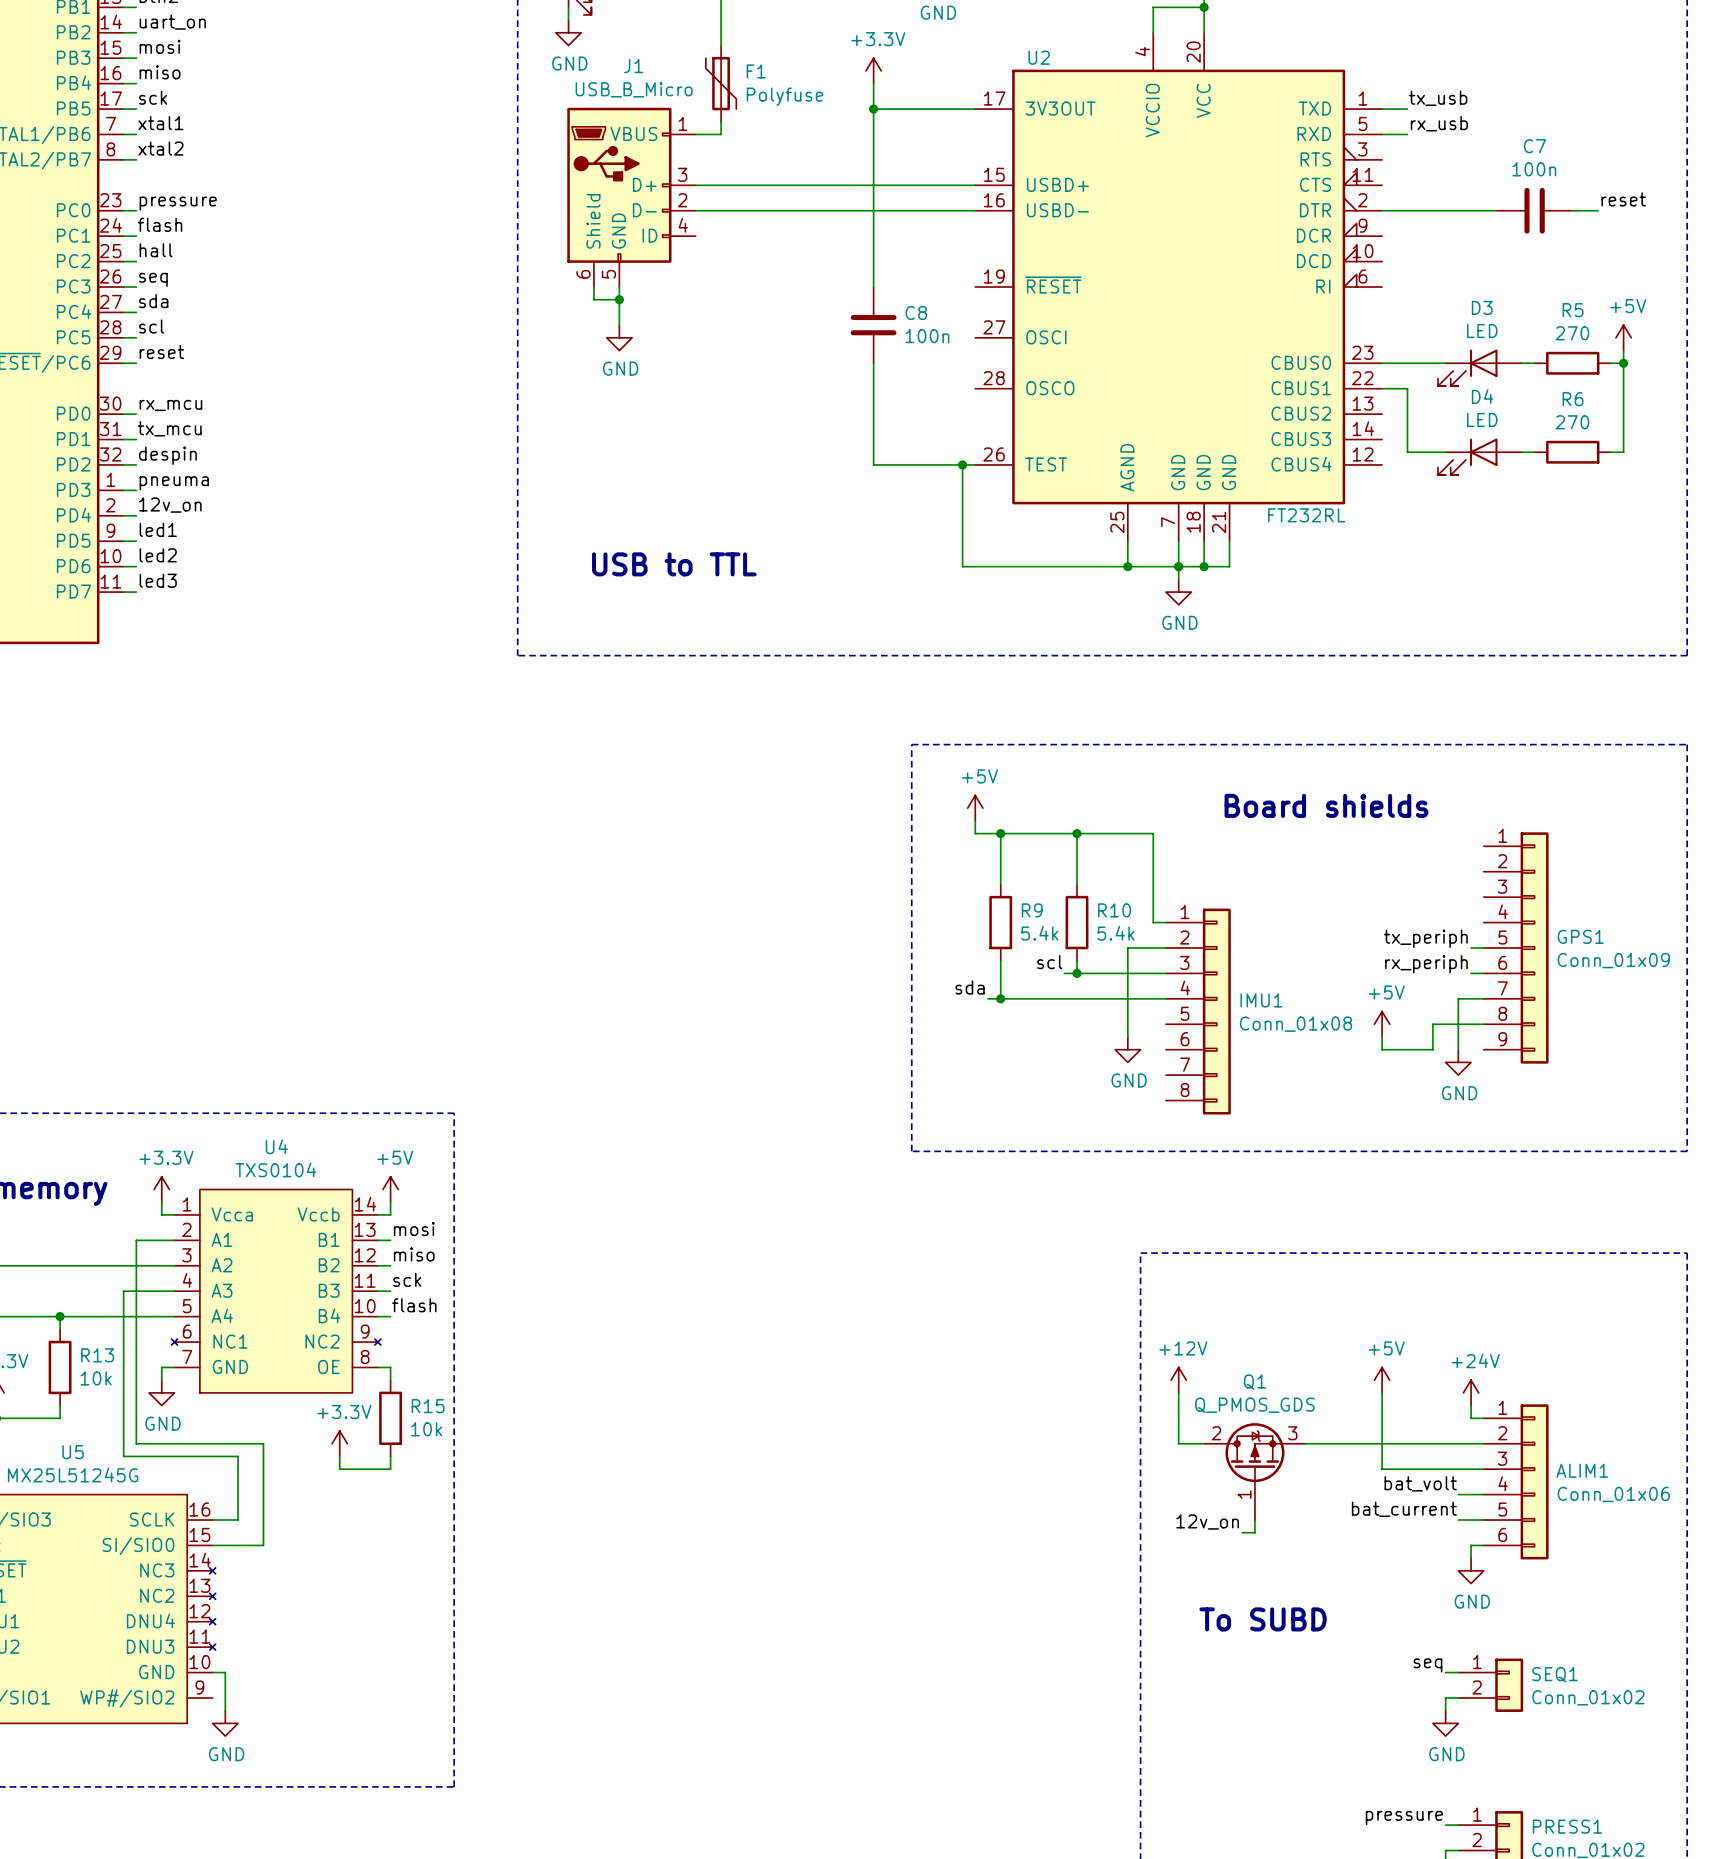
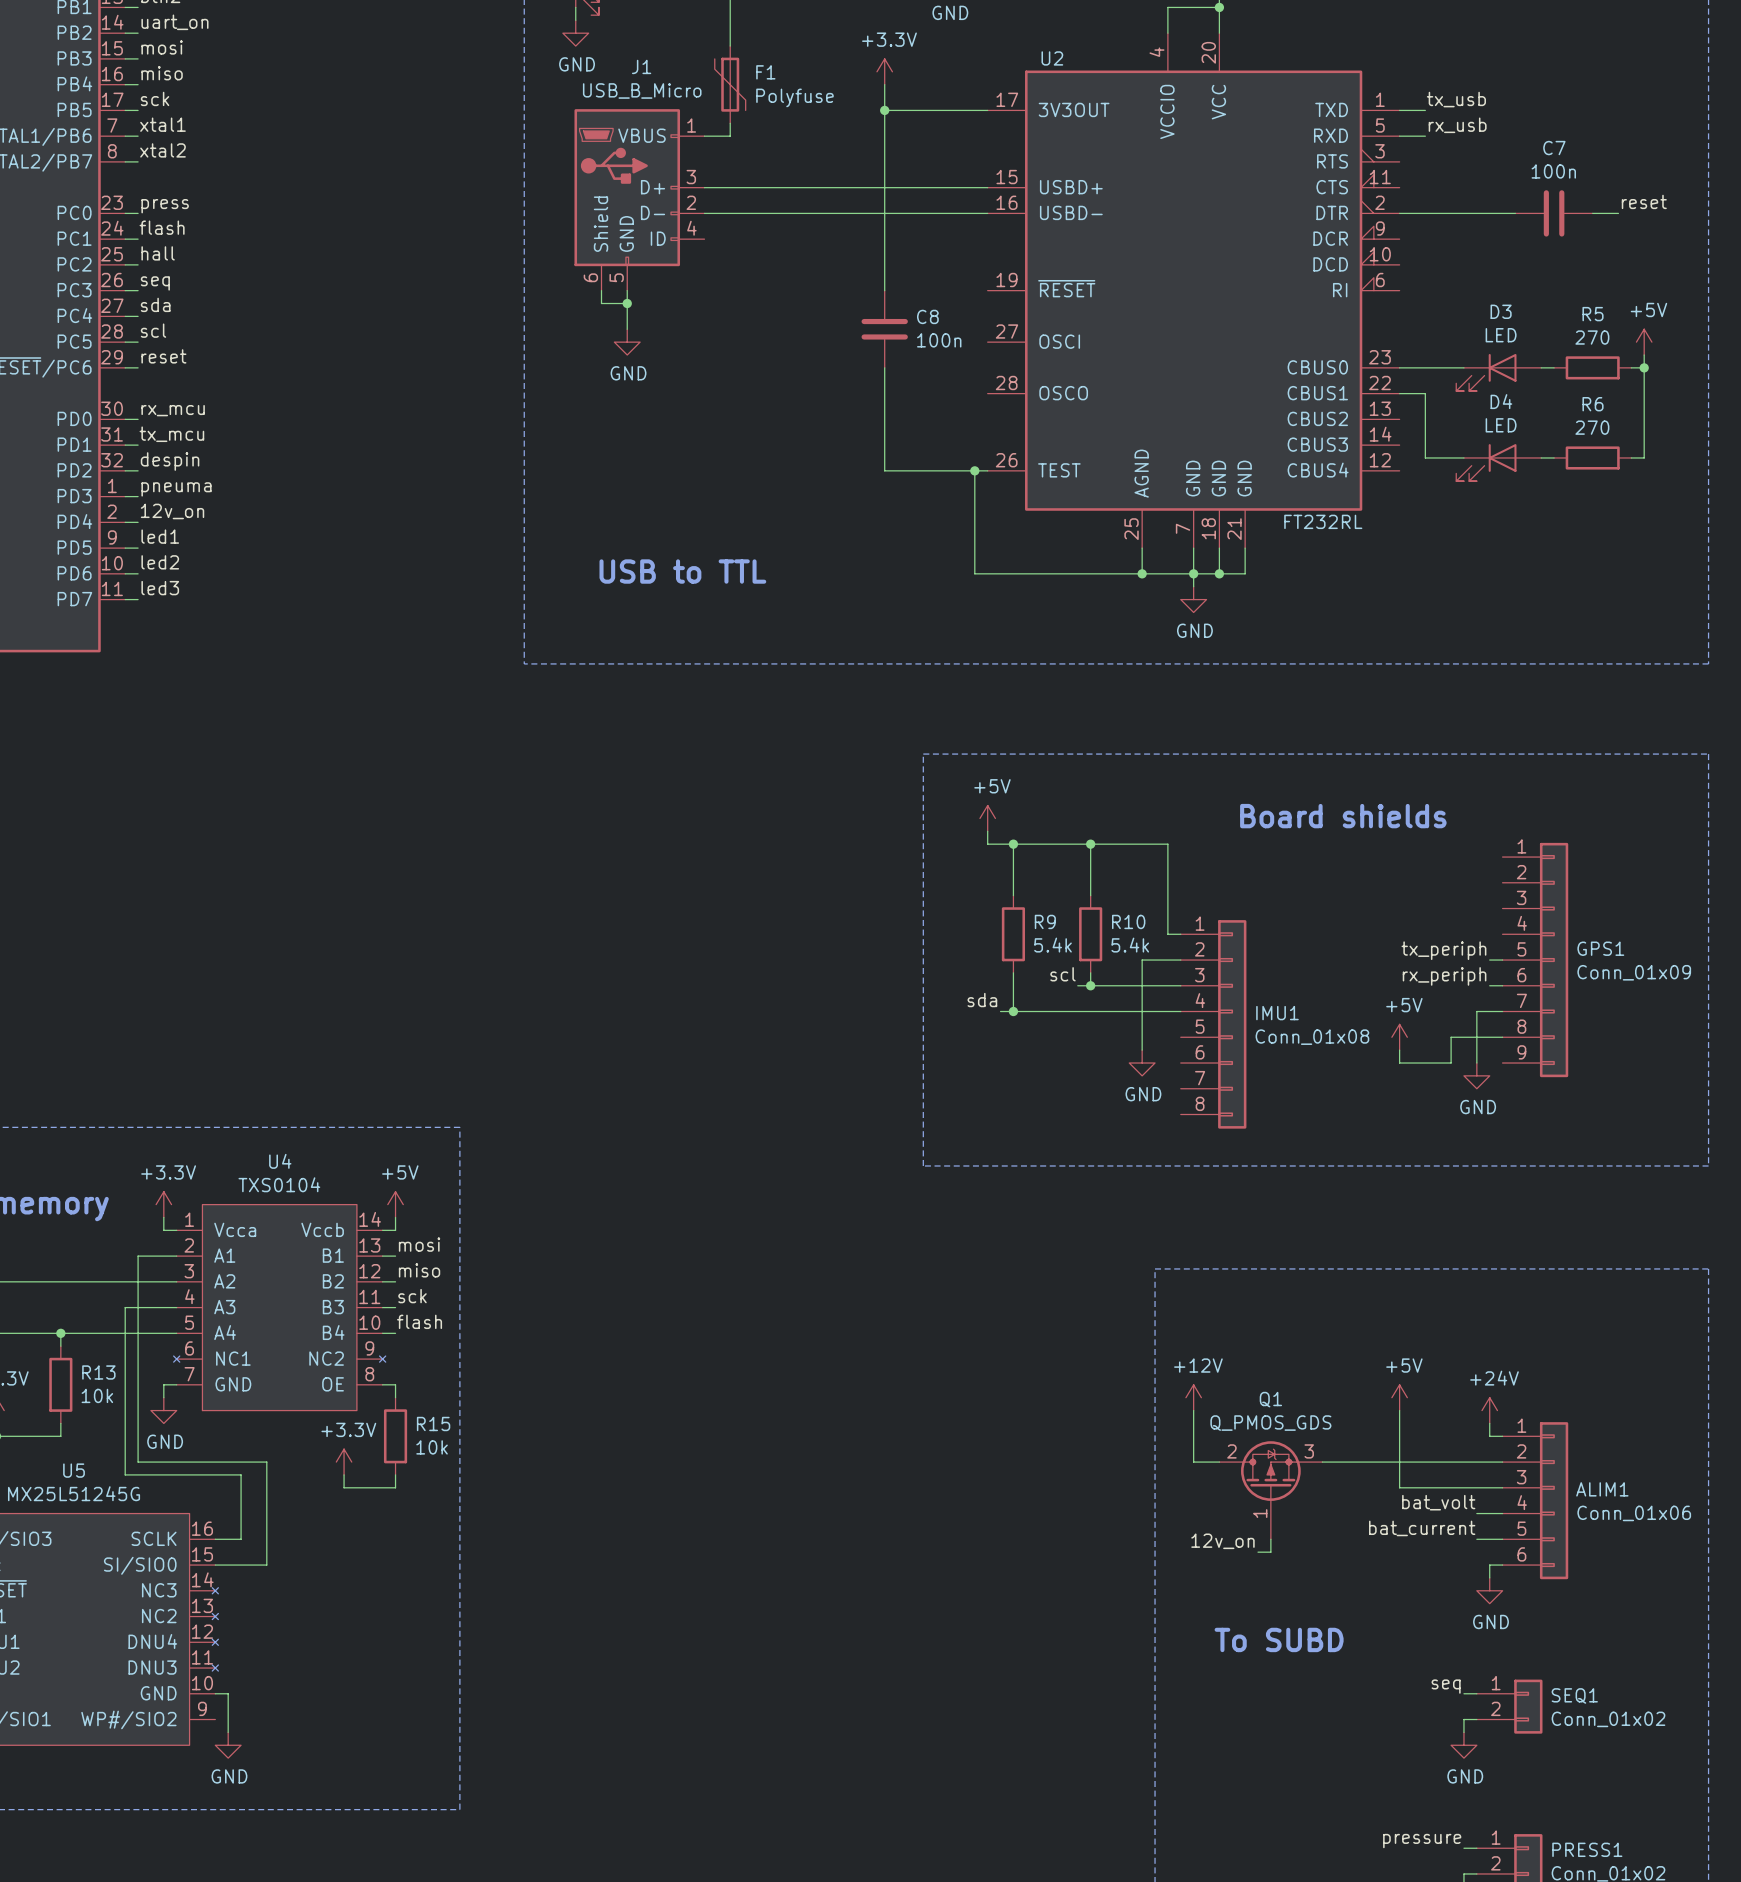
label: pressure (178, 203) -> press (165, 206)

